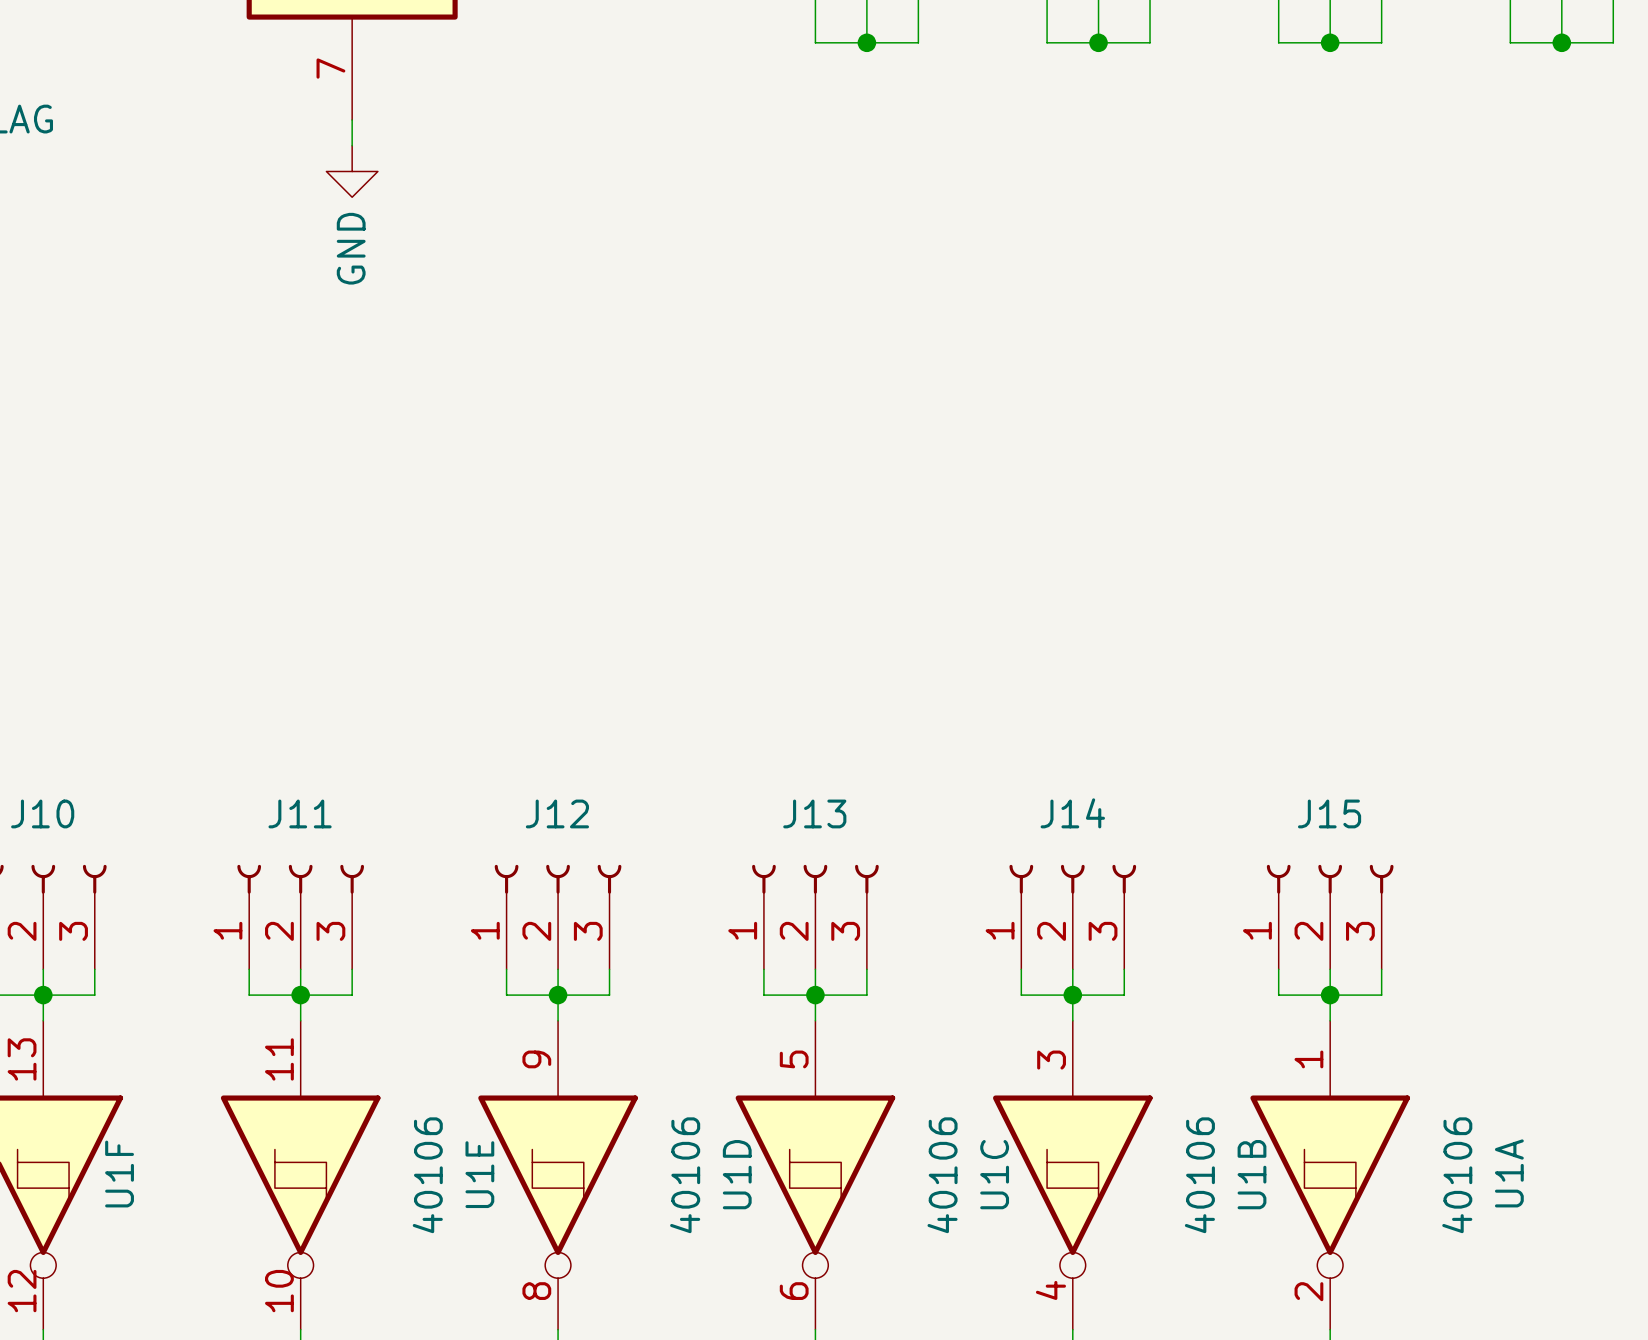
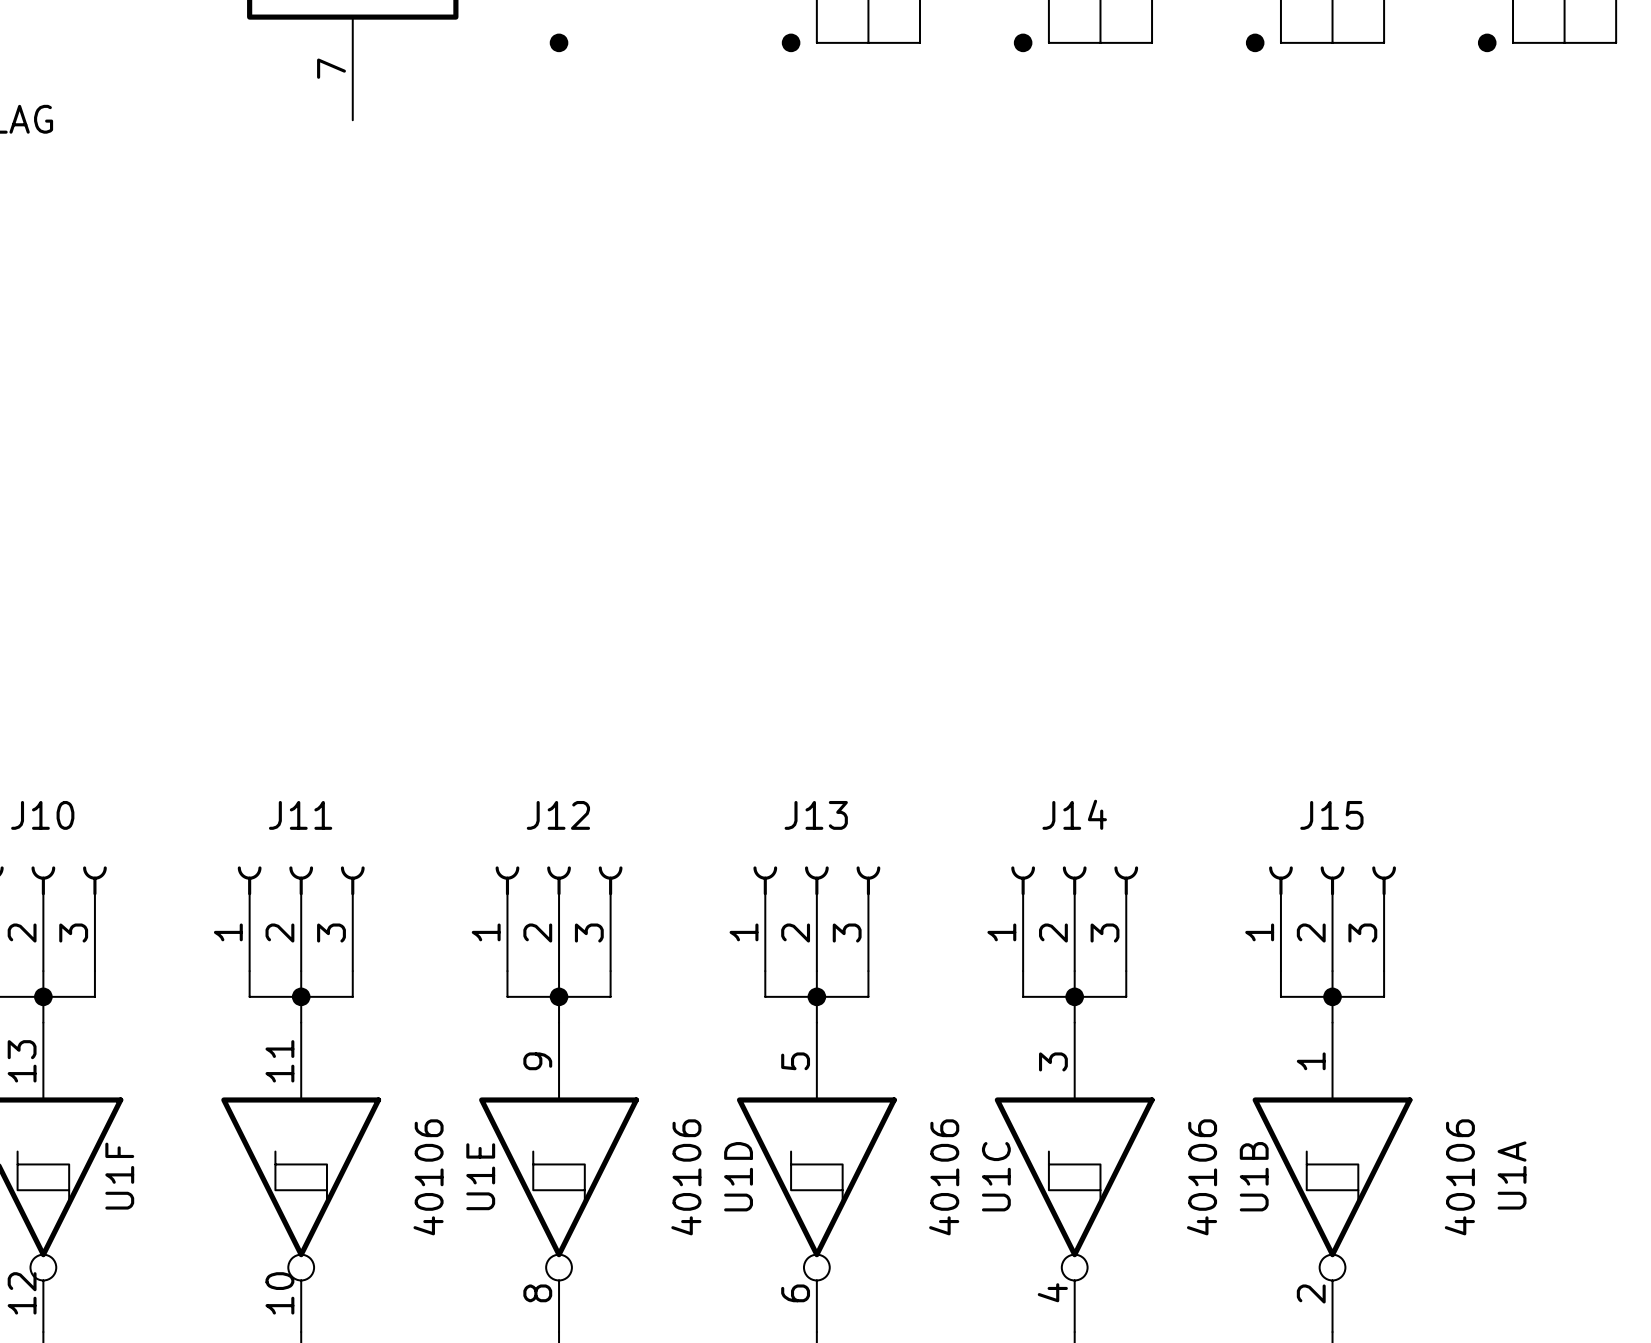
junction: none -> (559, 42)
junction: none -> (791, 42)
junction: (866, 42) -> none
junction: none -> (1023, 42)
junction: (1098, 42) -> none
junction: none -> (1255, 42)
junction: (1330, 42) -> none
junction: none -> (1487, 42)
junction: (1561, 42) -> none
wire: (352, 120) (352, 145) -> none
power symbol: GND (352, 171) -> none

